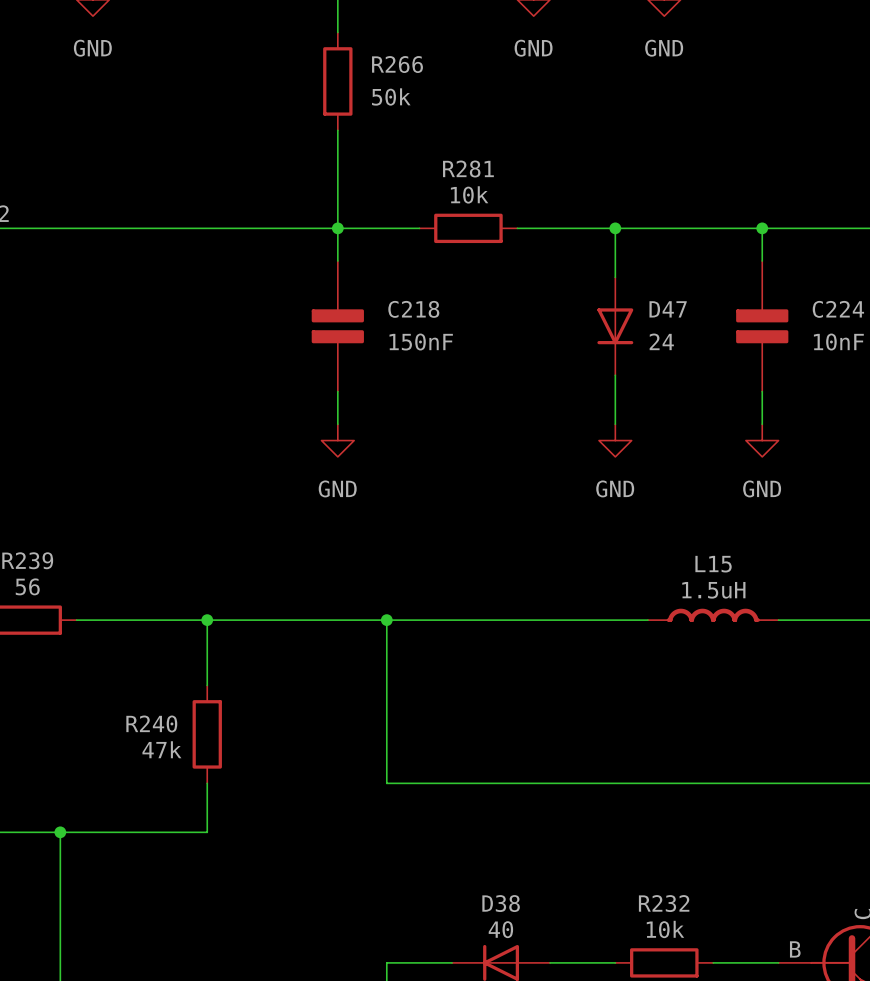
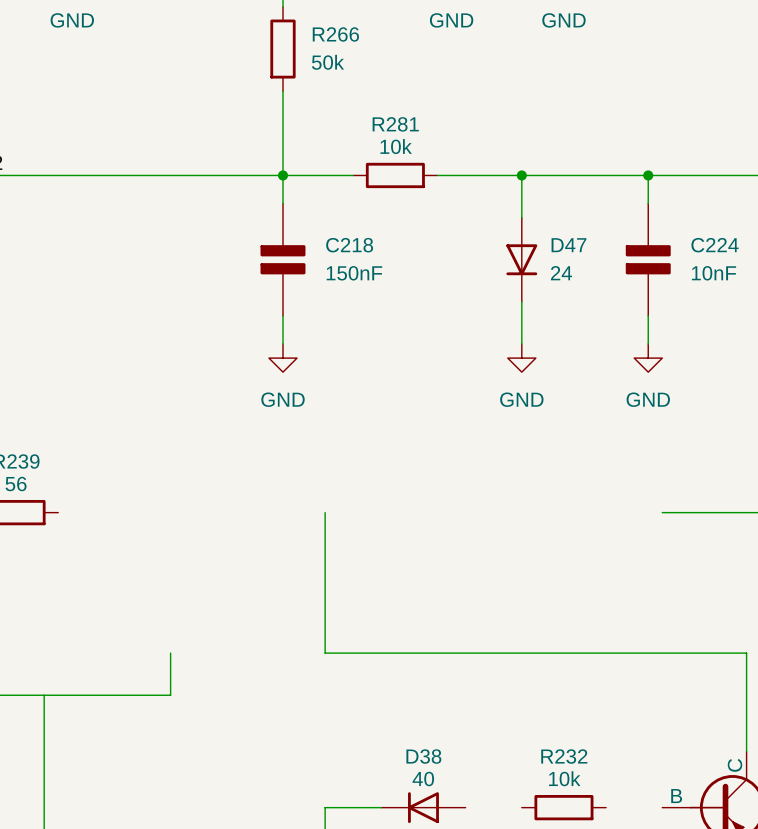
L15: 1.5uH (713, 615) -> none
wire: (76, 620) (647, 620) -> none
wire: (207, 620) (207, 685) -> none
junction: (207, 620) -> none
junction: (386, 620) -> none
R240: 47k (207, 734) -> none
junction: (60, 832) -> none
wire: (550, 962) (615, 962) -> none
wire: (713, 962) (778, 962) -> none

